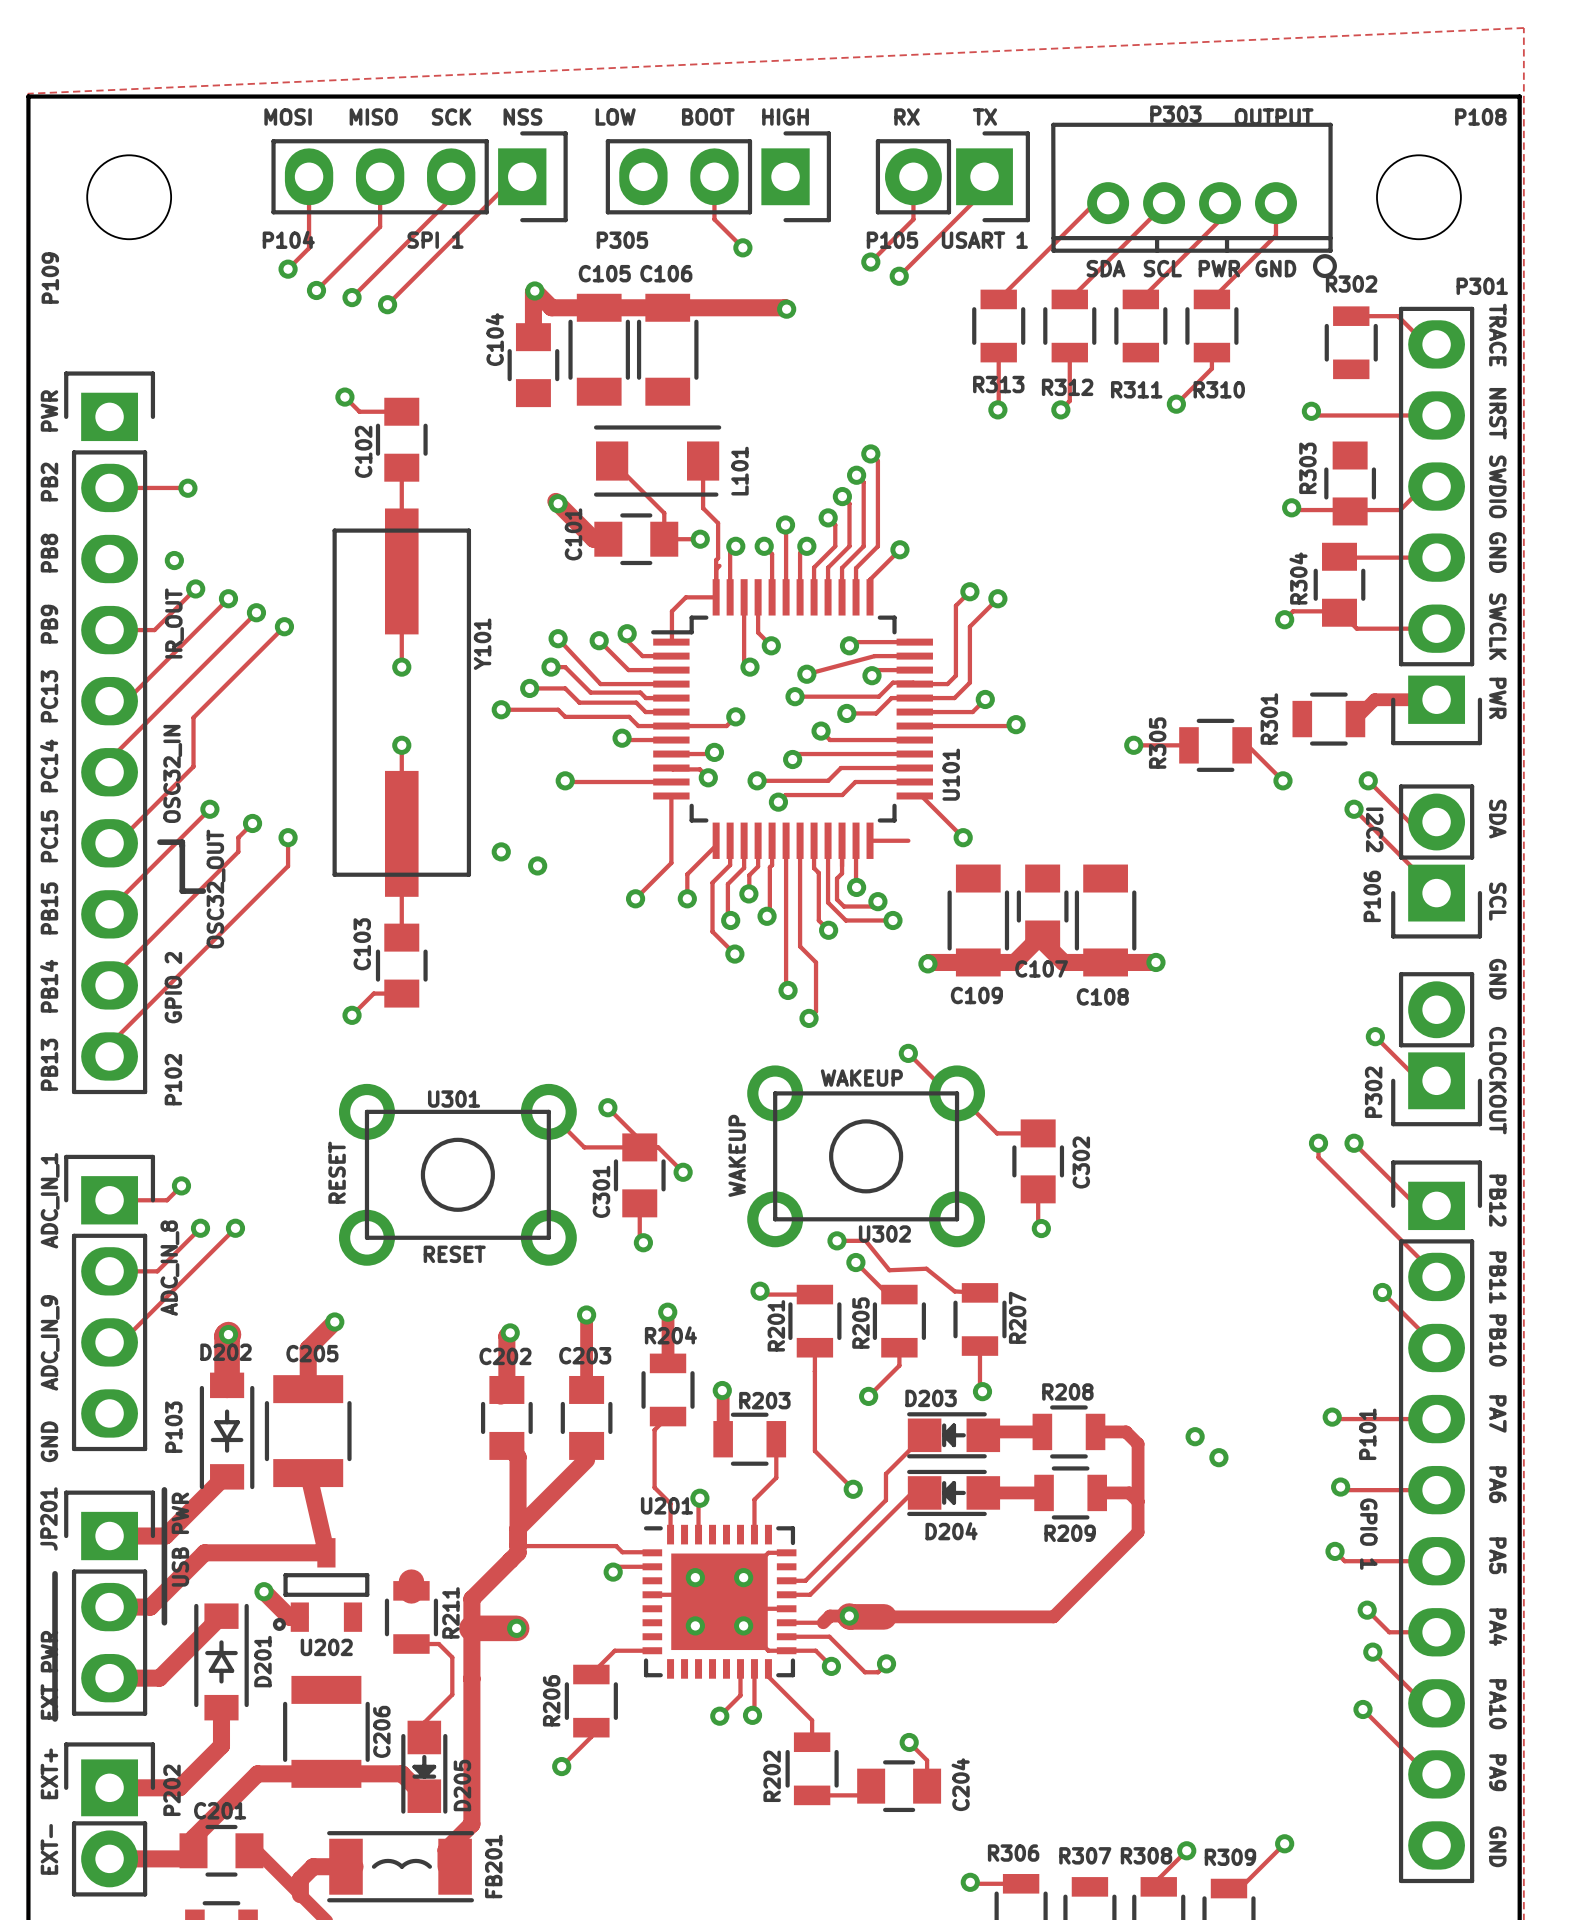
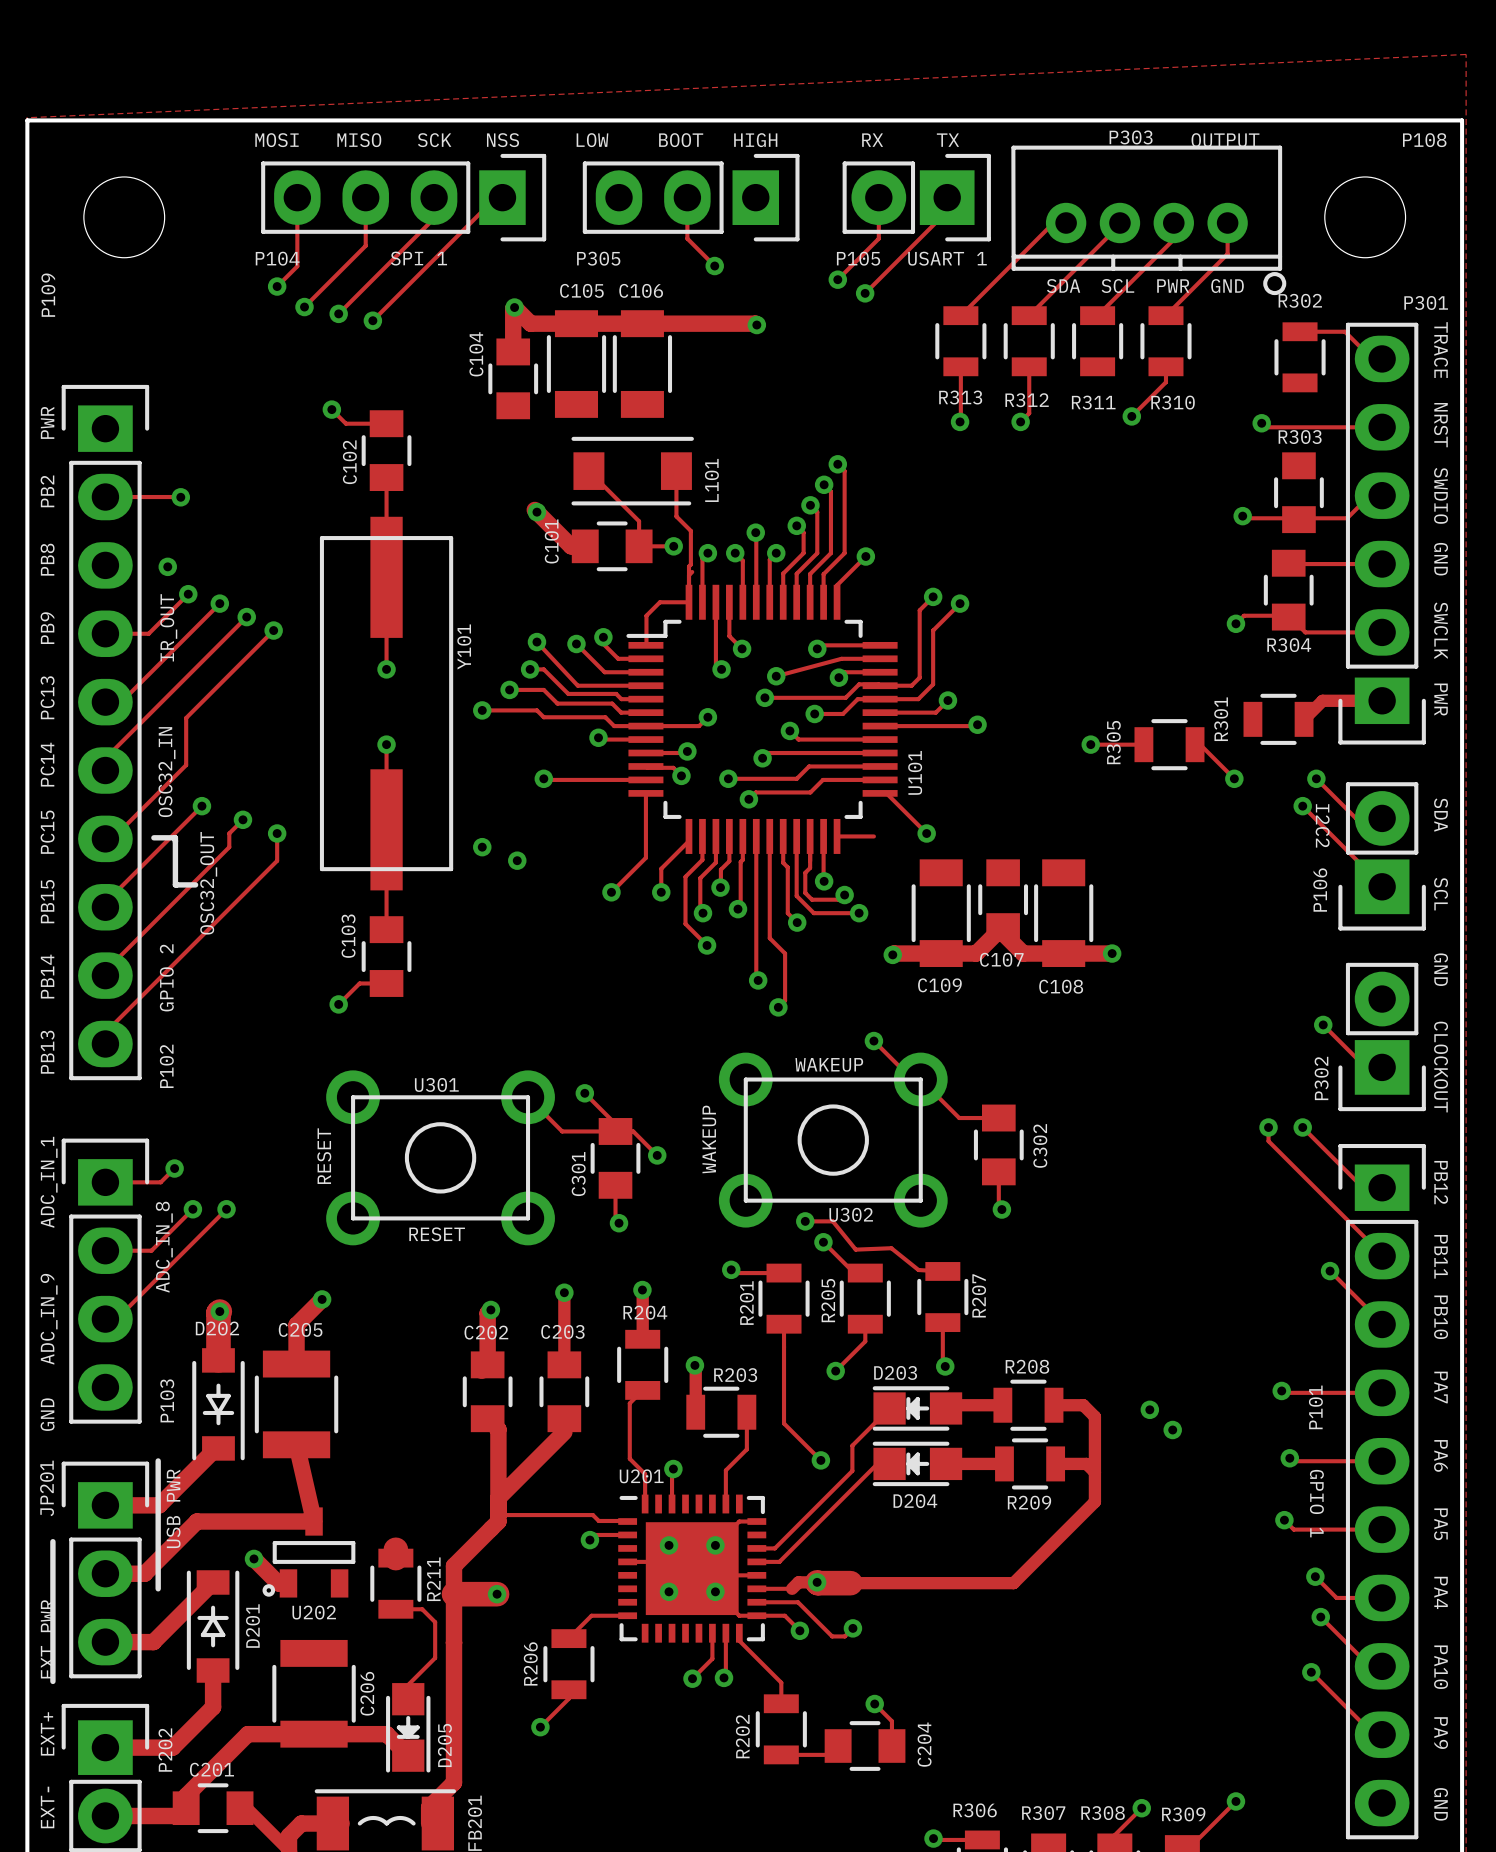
R303 name rotation: 0° (1307, 468) -> 90° clockwise (1300, 437)
R304 name rotation: 0° (1298, 578) -> 90° clockwise (1289, 645)
R304 name position: R304 (1298, 578) -> R304 (1289, 645)

